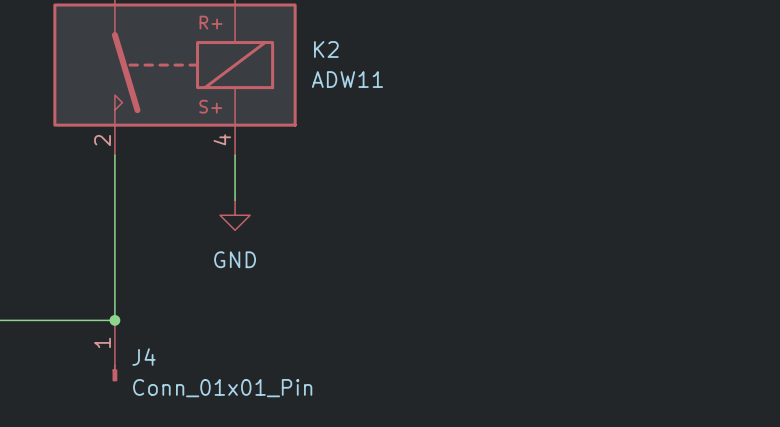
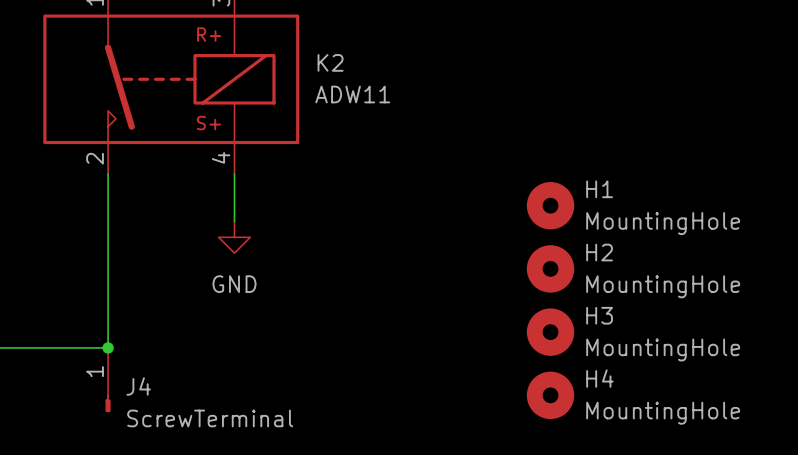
H1: none -> MountingHole (550, 205)
H2: none -> MountingHole (550, 268)
H3: none -> MountingHole (550, 332)
H4: none -> MountingHole (550, 395)
J4 value: Conn_01x01_Pin (222, 388) -> ScrewTerminal (210, 418)

